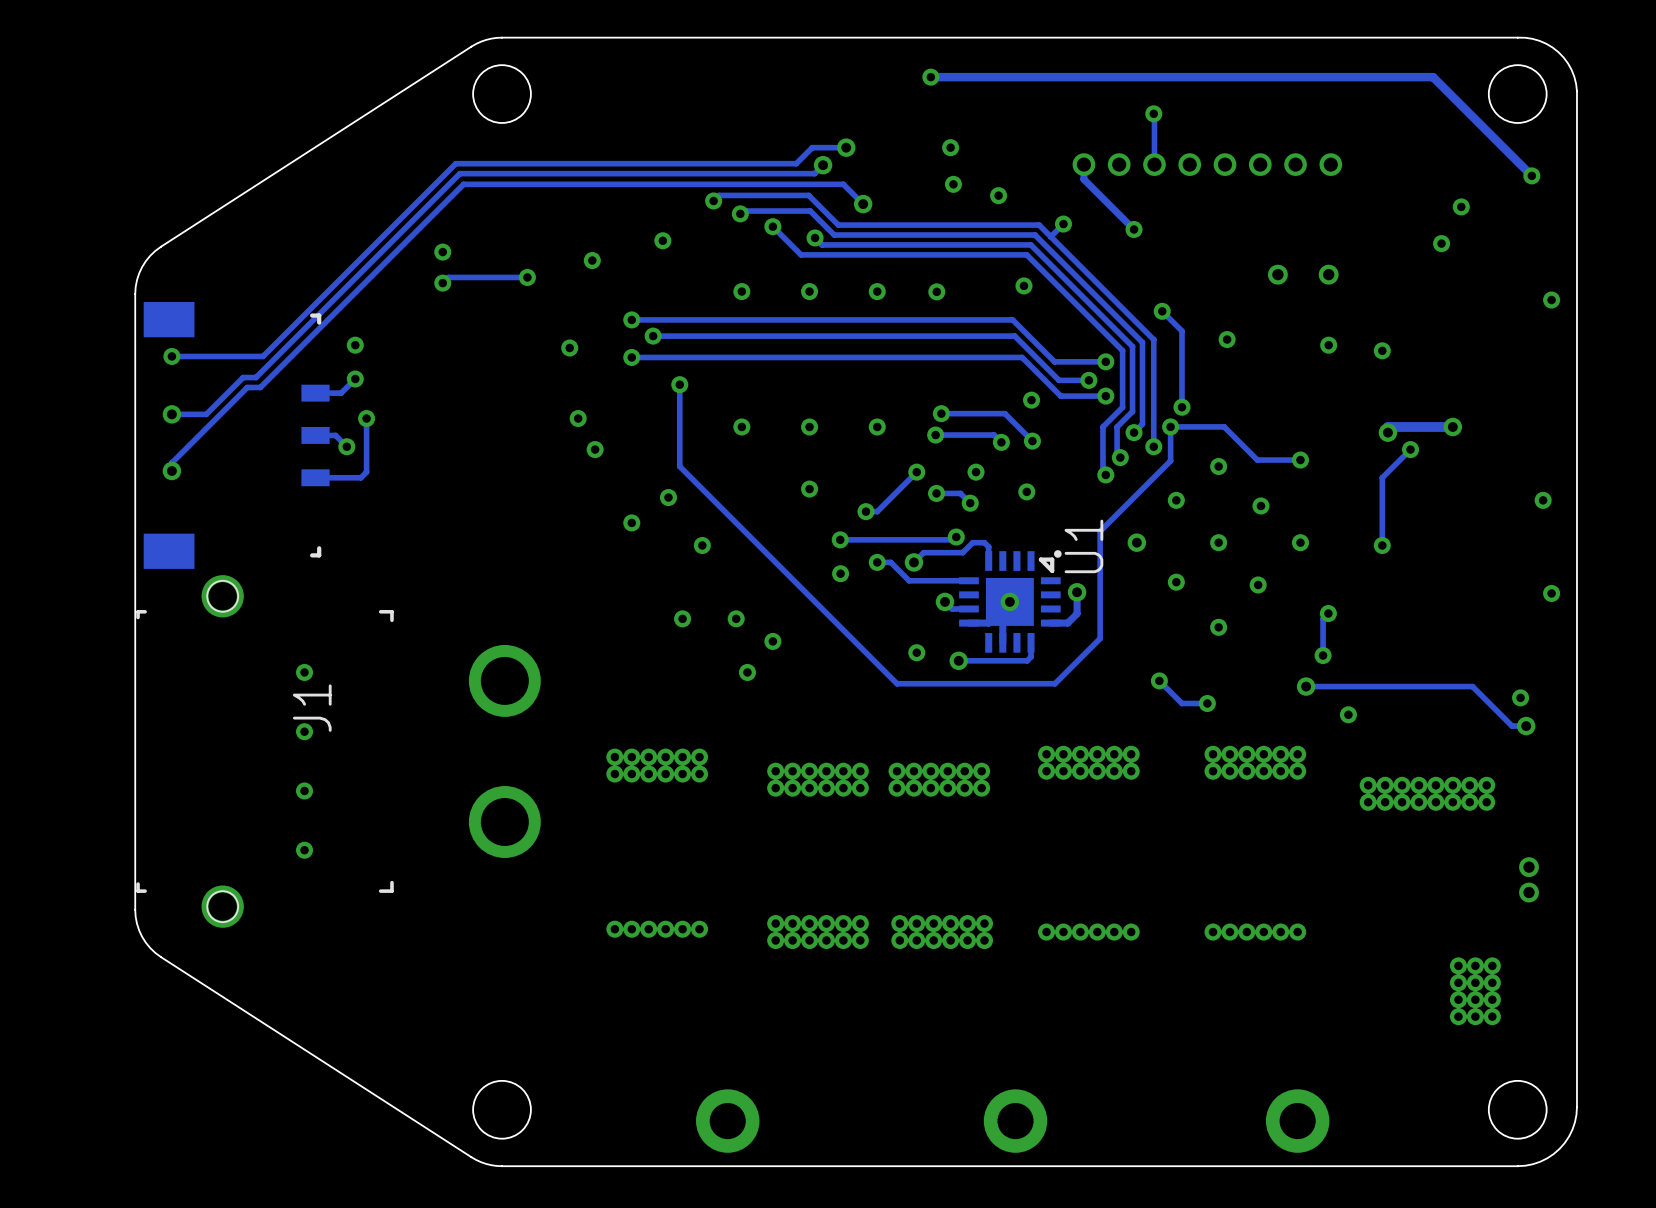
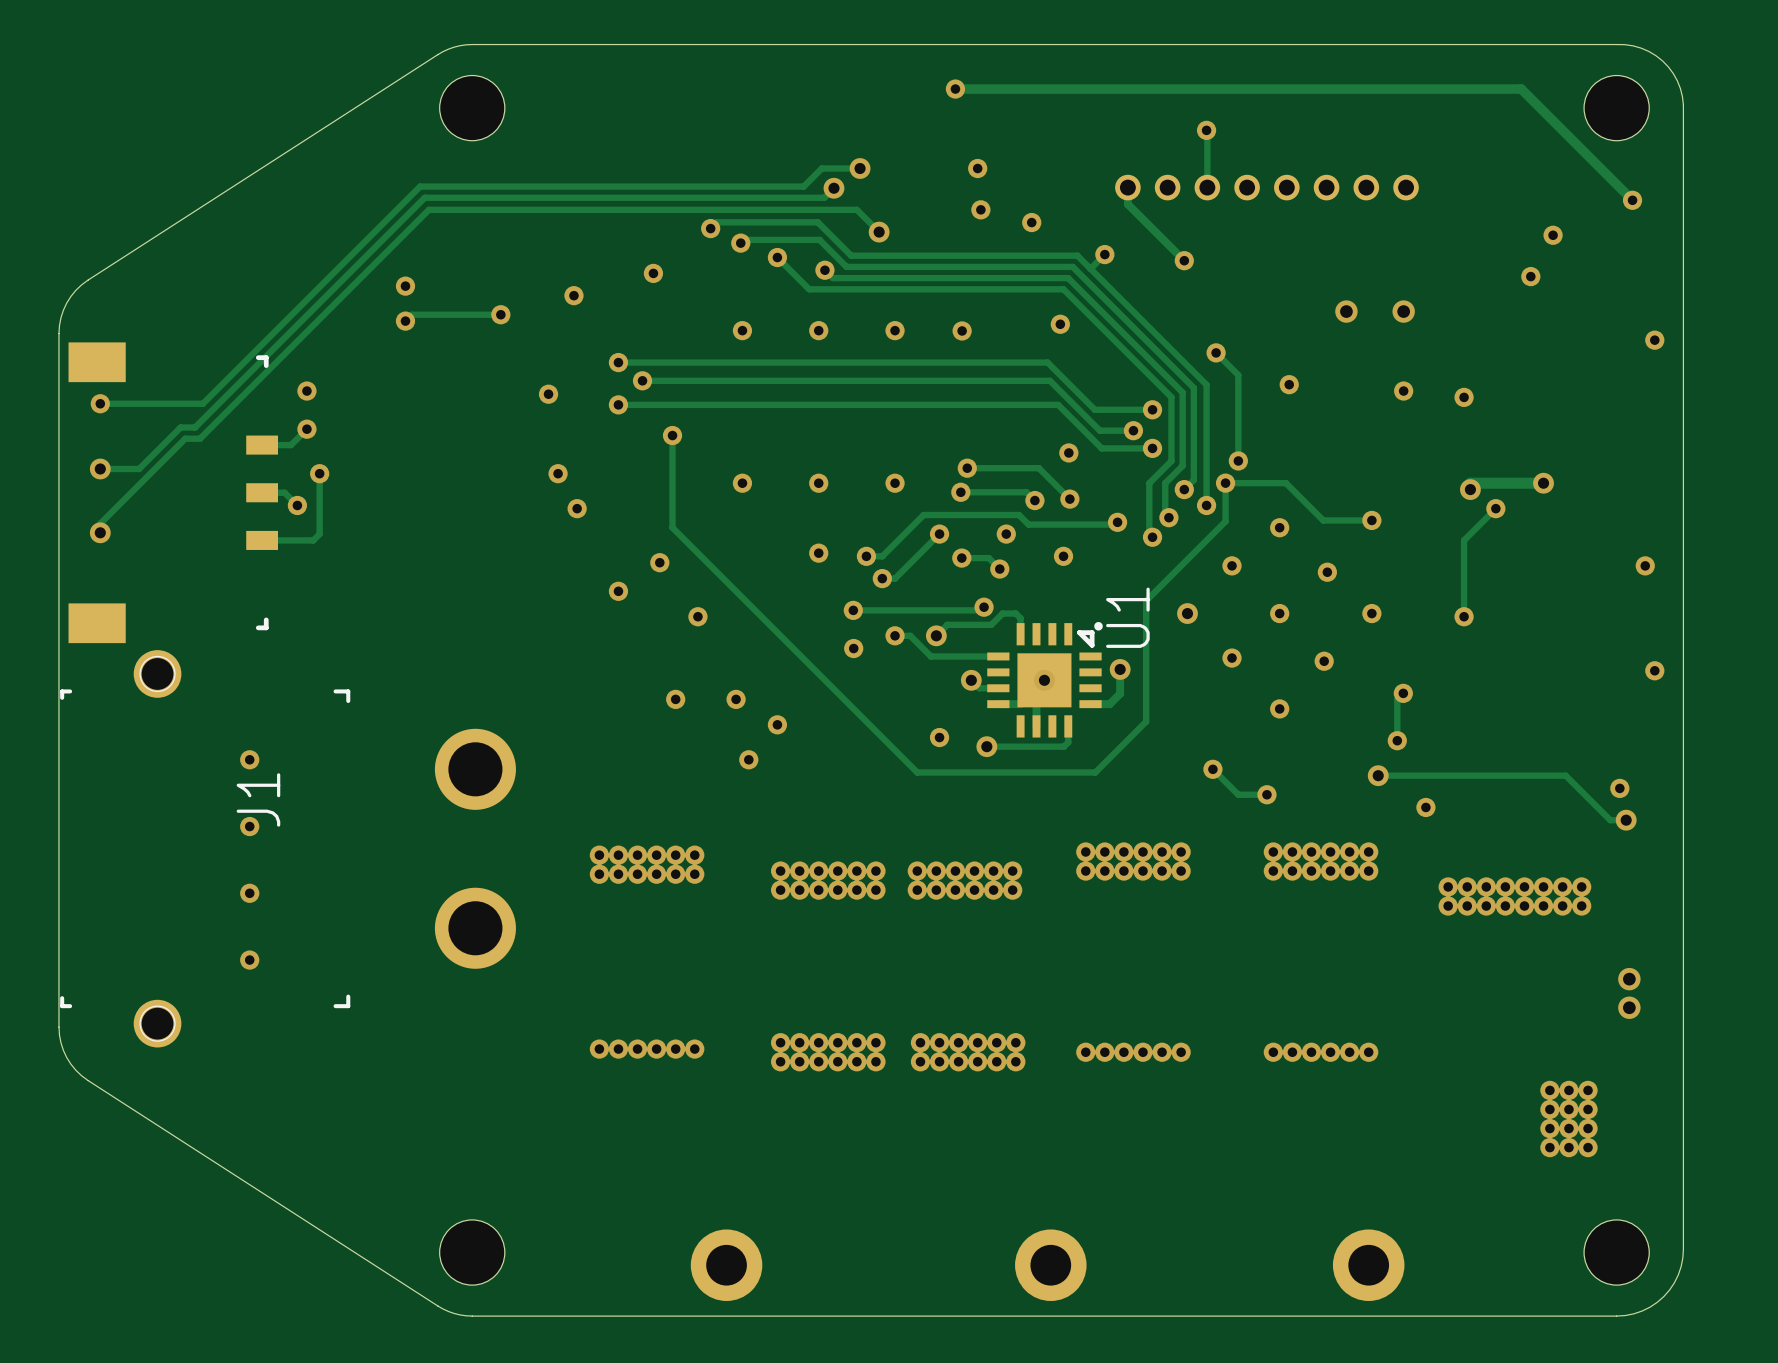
track: none -> (1117, 522) (1115, 524) (1028, 524) (1019, 515) (923, 515) (882, 556) (866, 556)
via: none -> (1117, 522)
via: none -> (866, 556)

